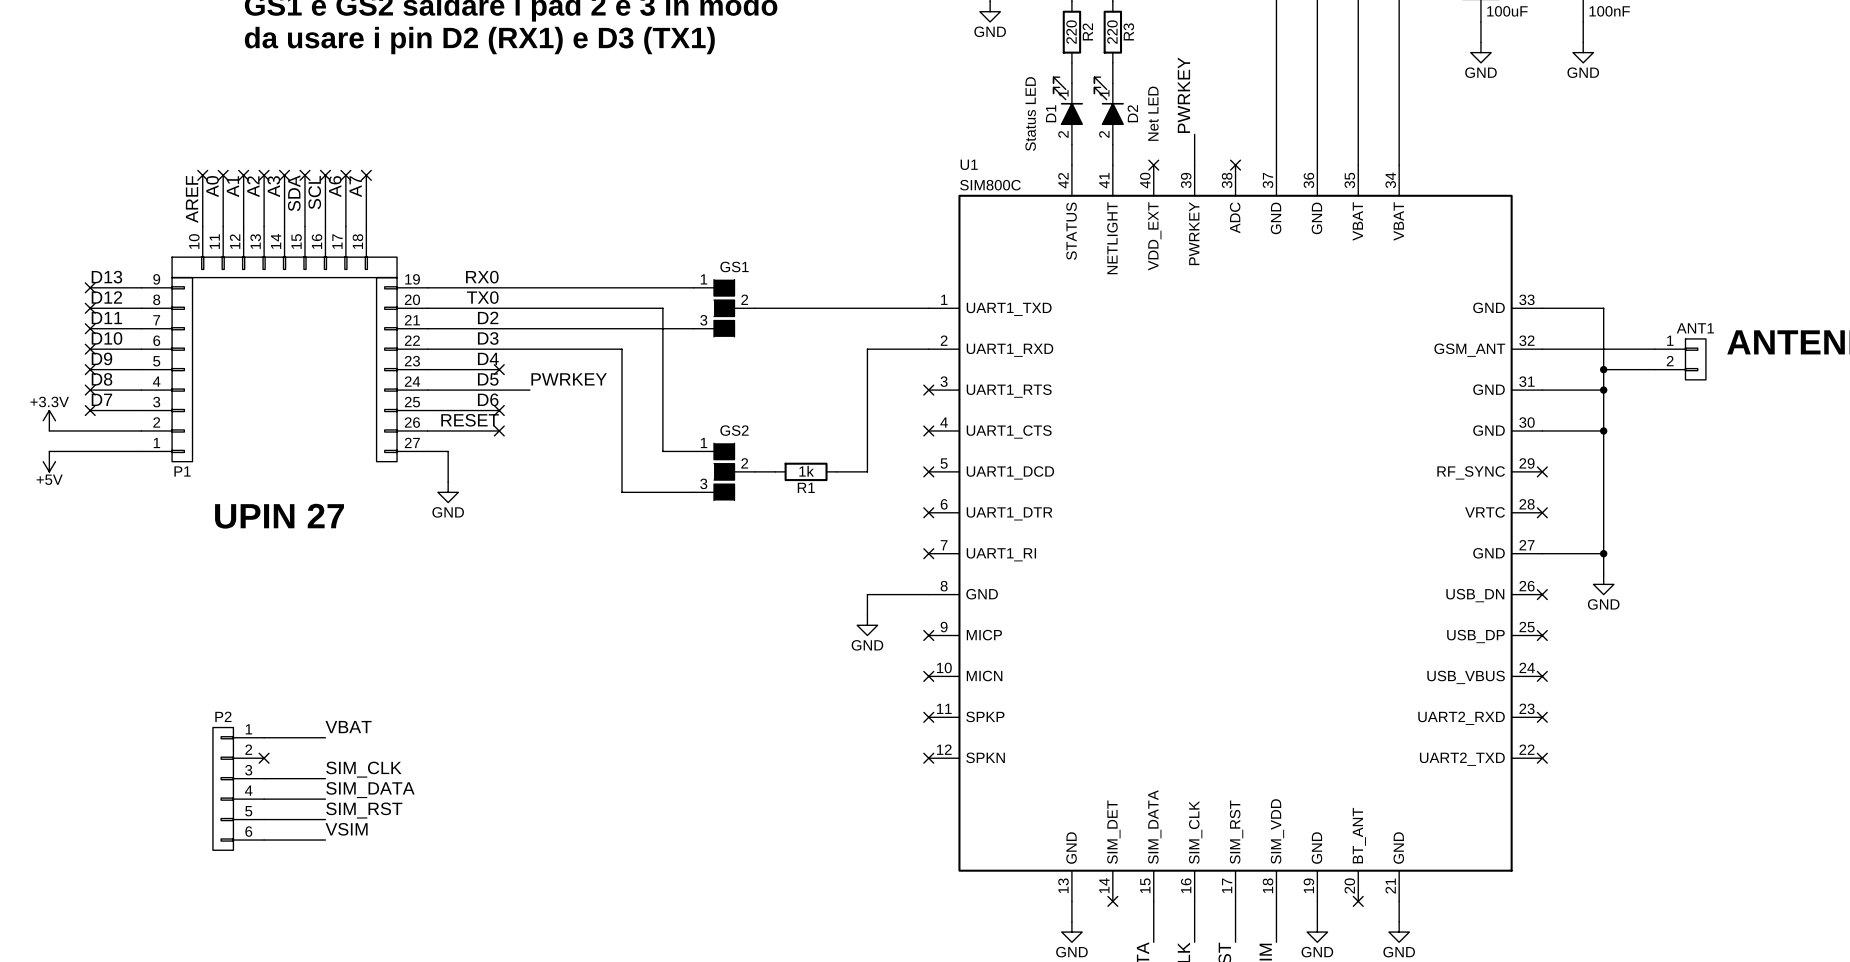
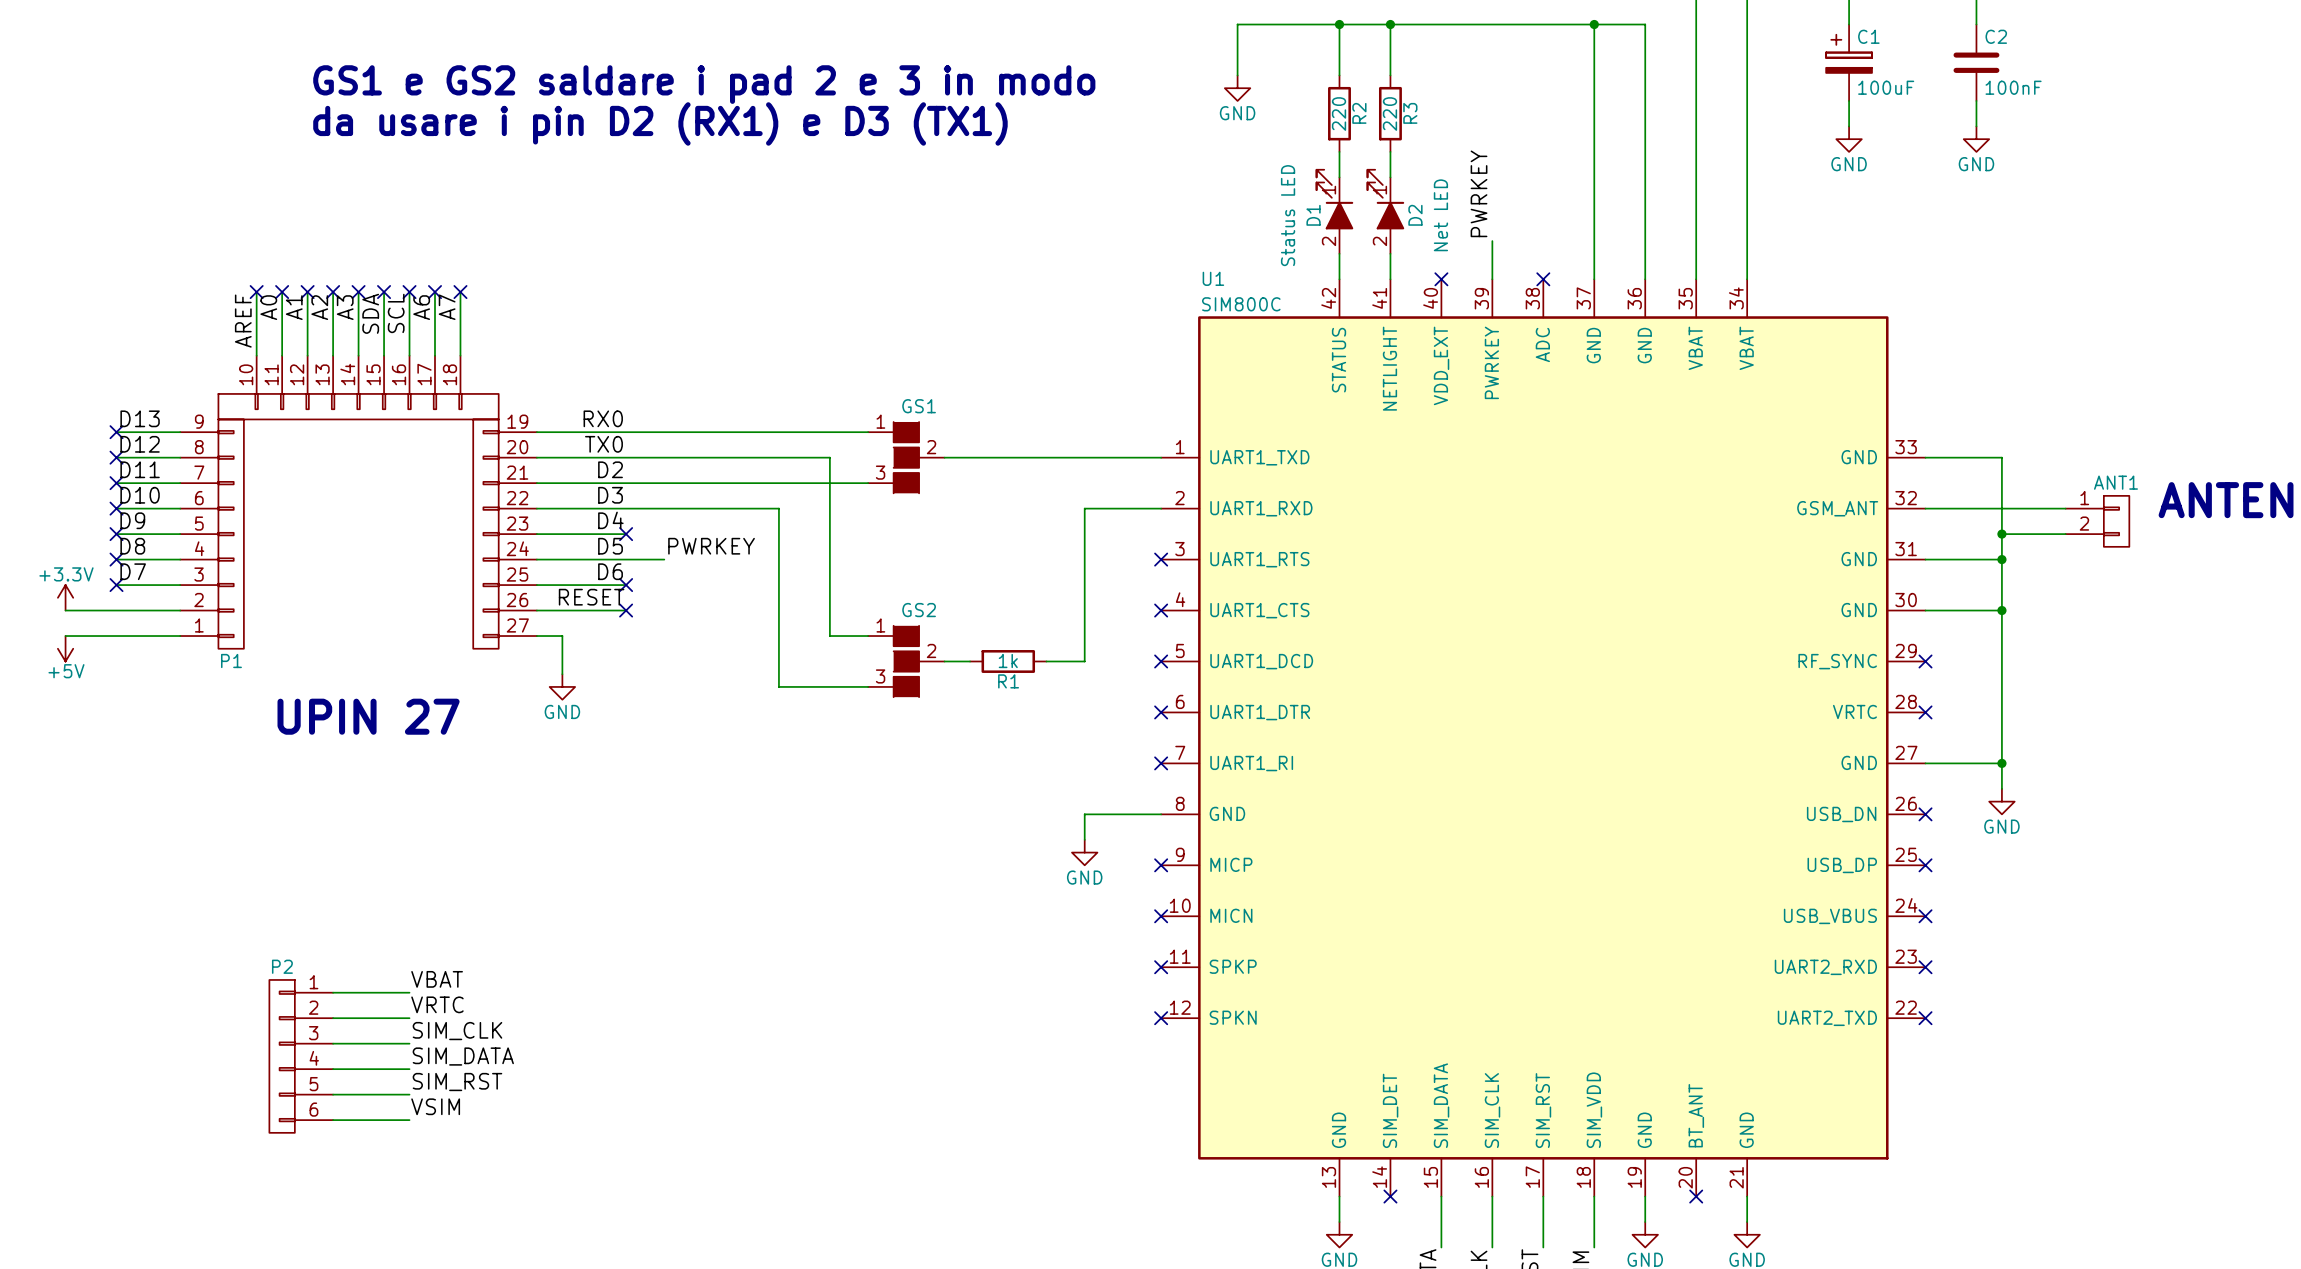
label: none -> VRTC (437, 1004)
wire: none -> (333, 1018) (409, 1018)
no-connect mark: (264, 758) -> none

